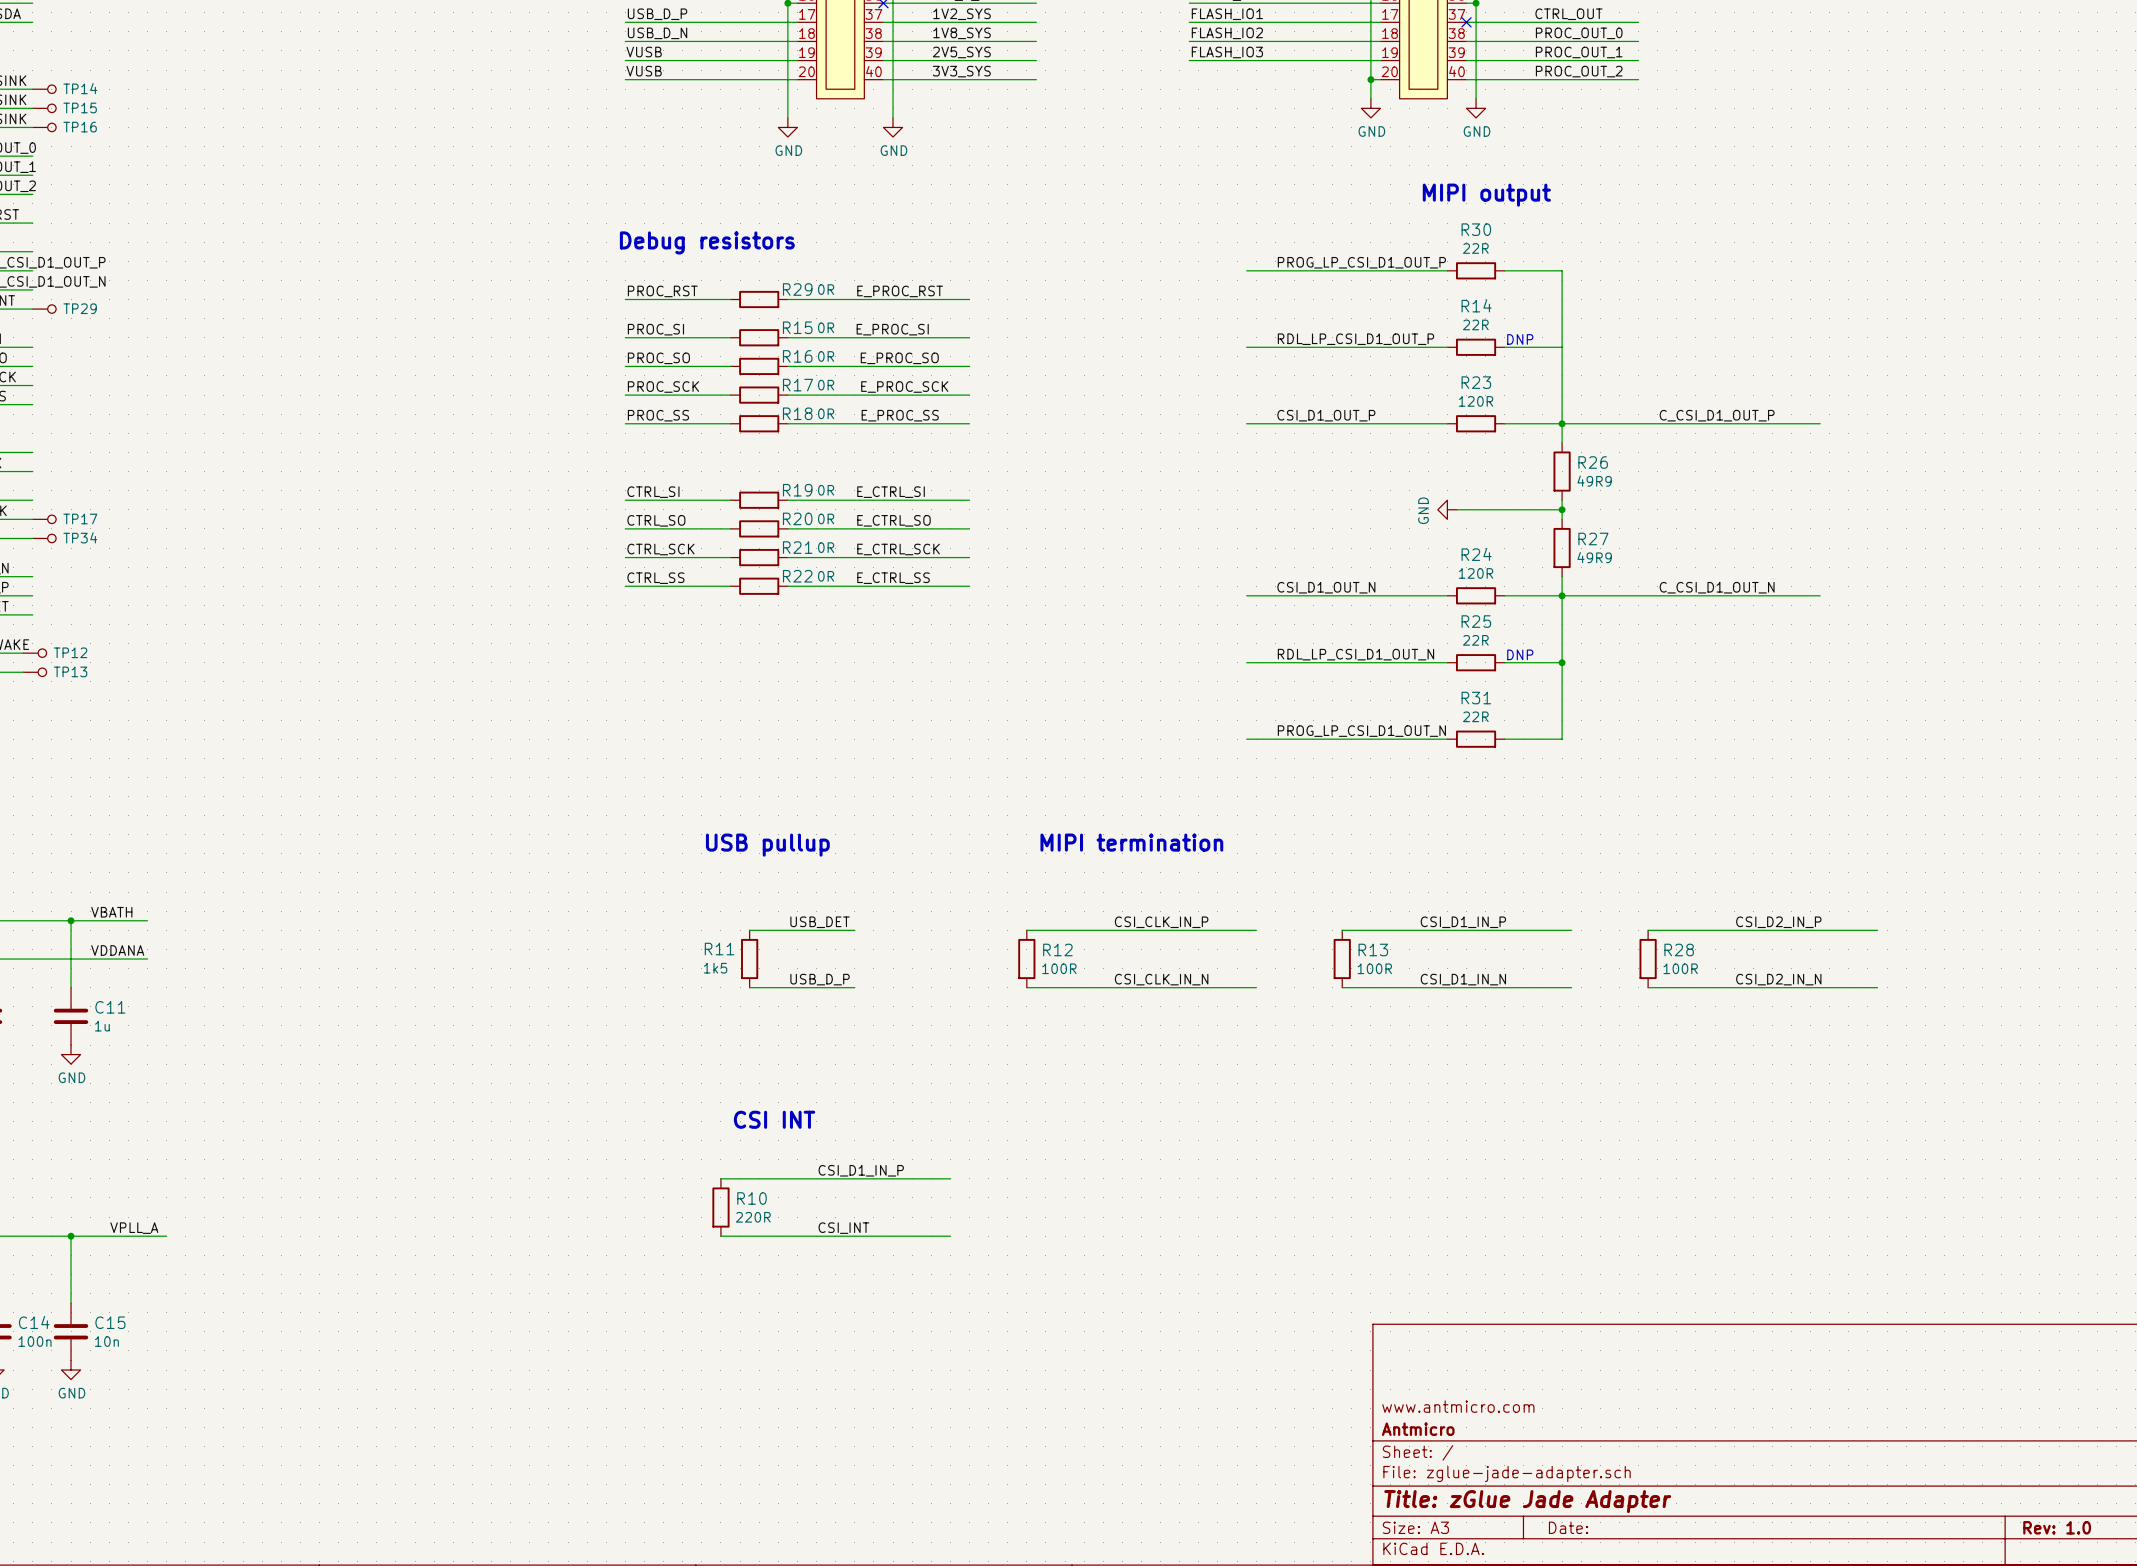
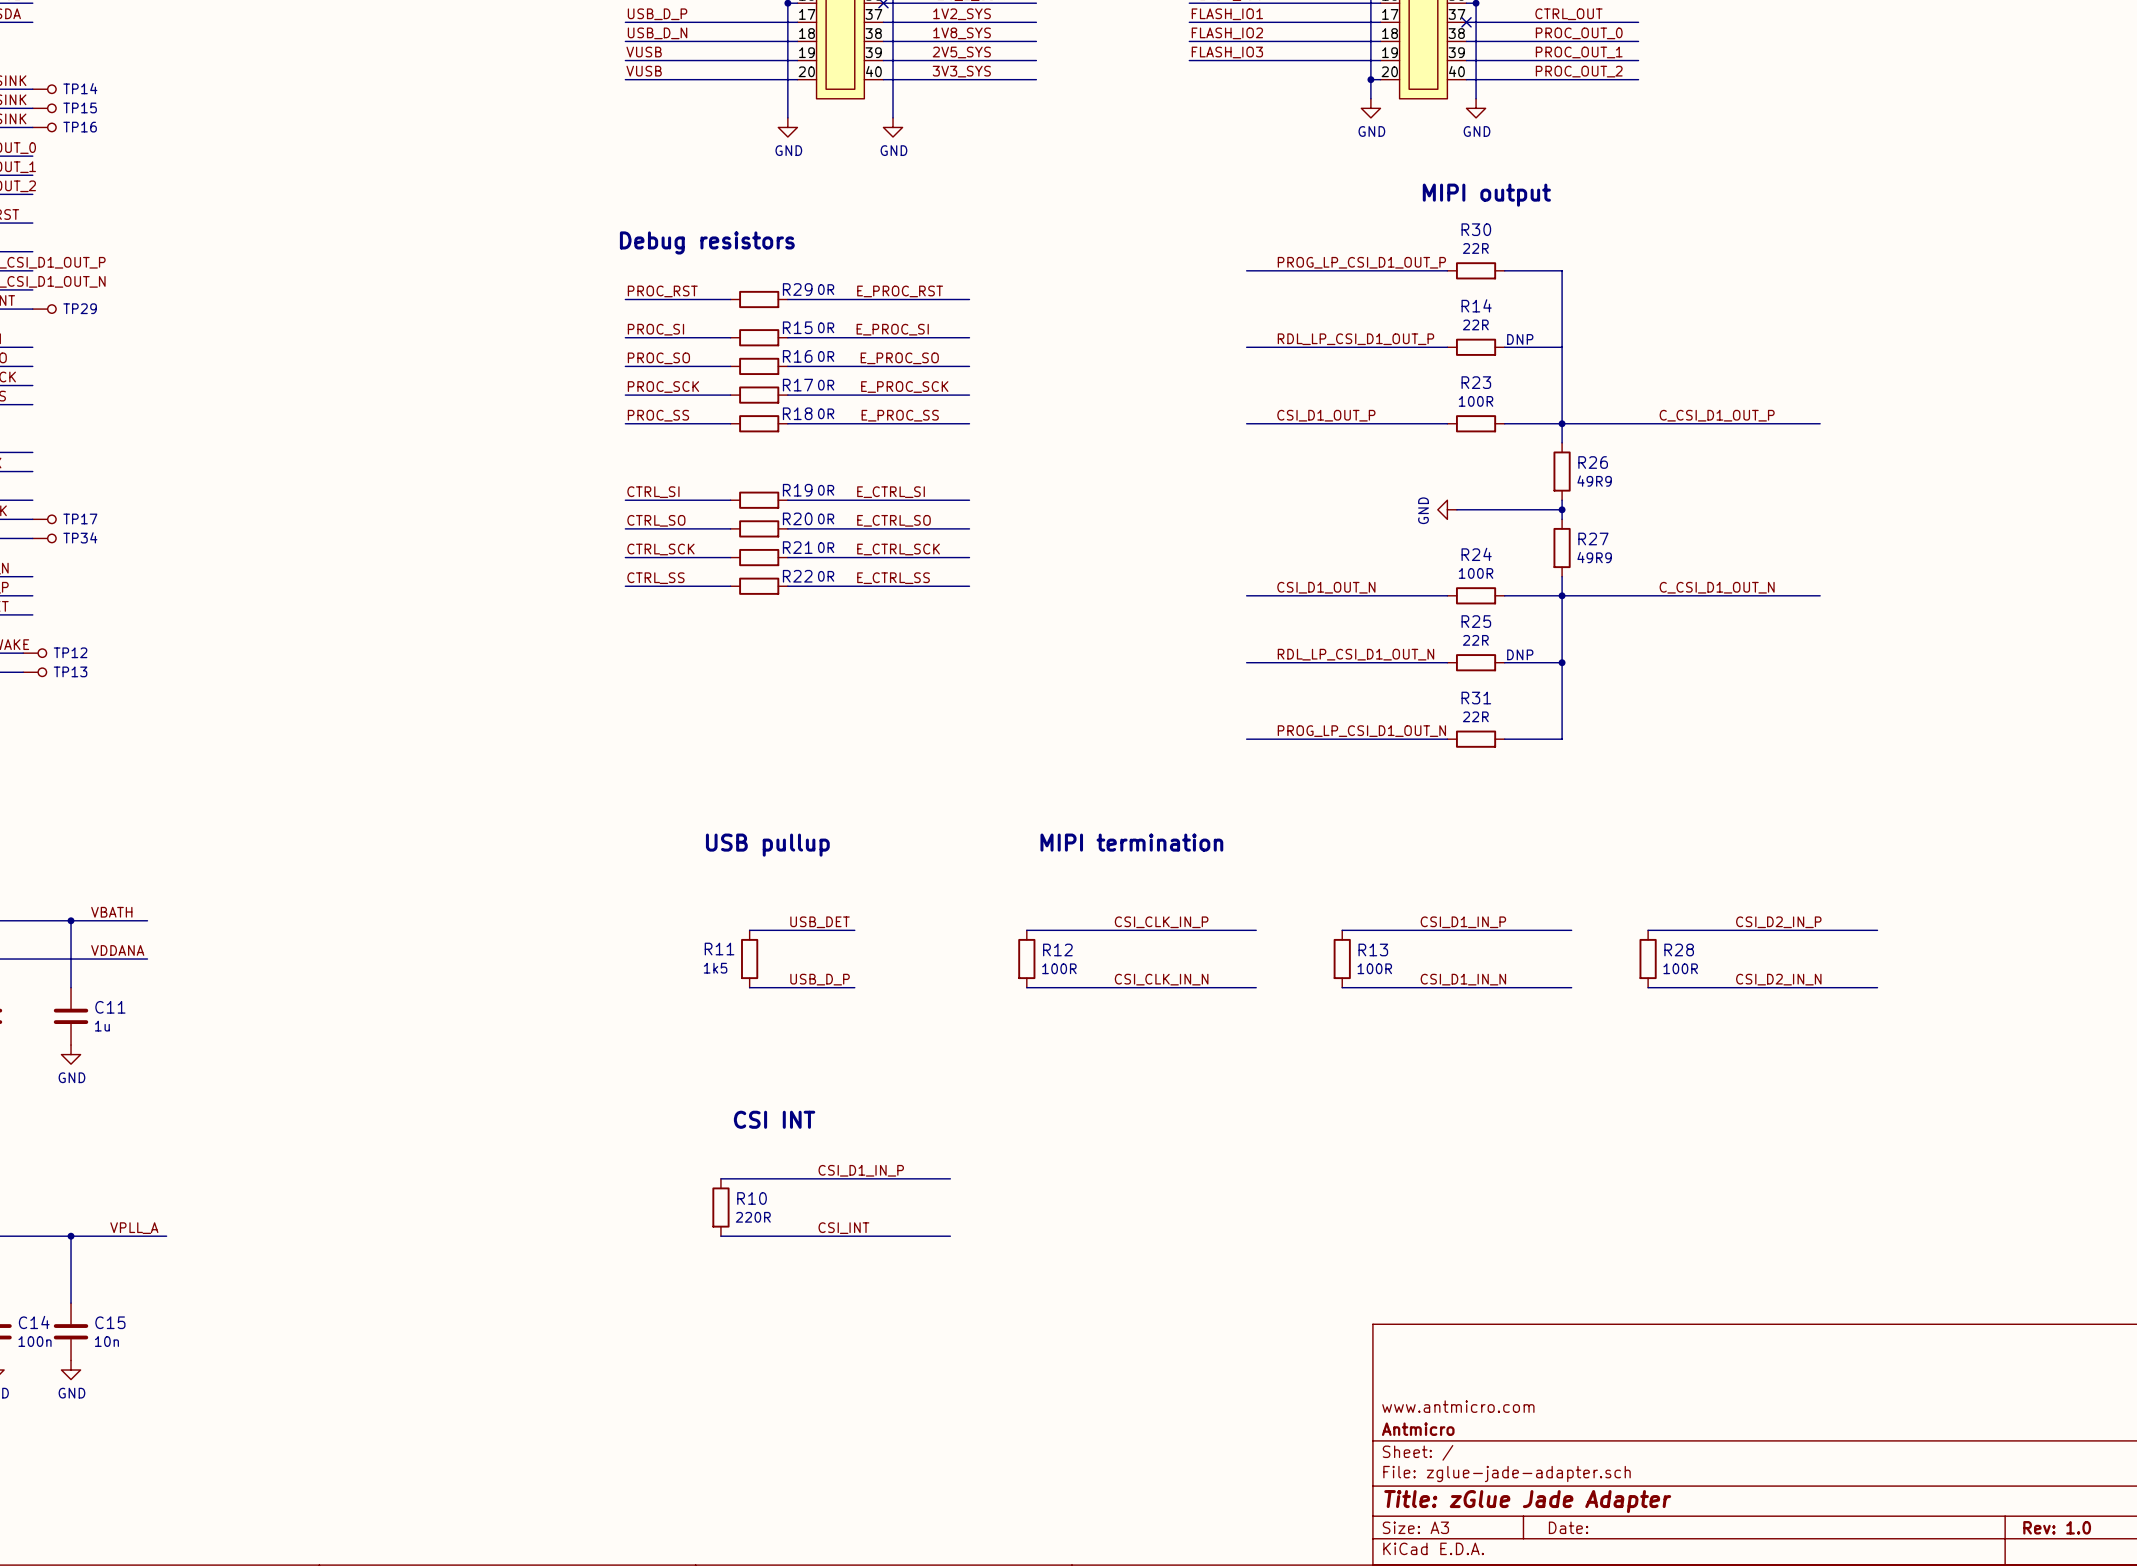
R23 text: 120R (1476, 401) -> 100R (1476, 401)
R24 text: 120R (1476, 573) -> 100R (1476, 573)

